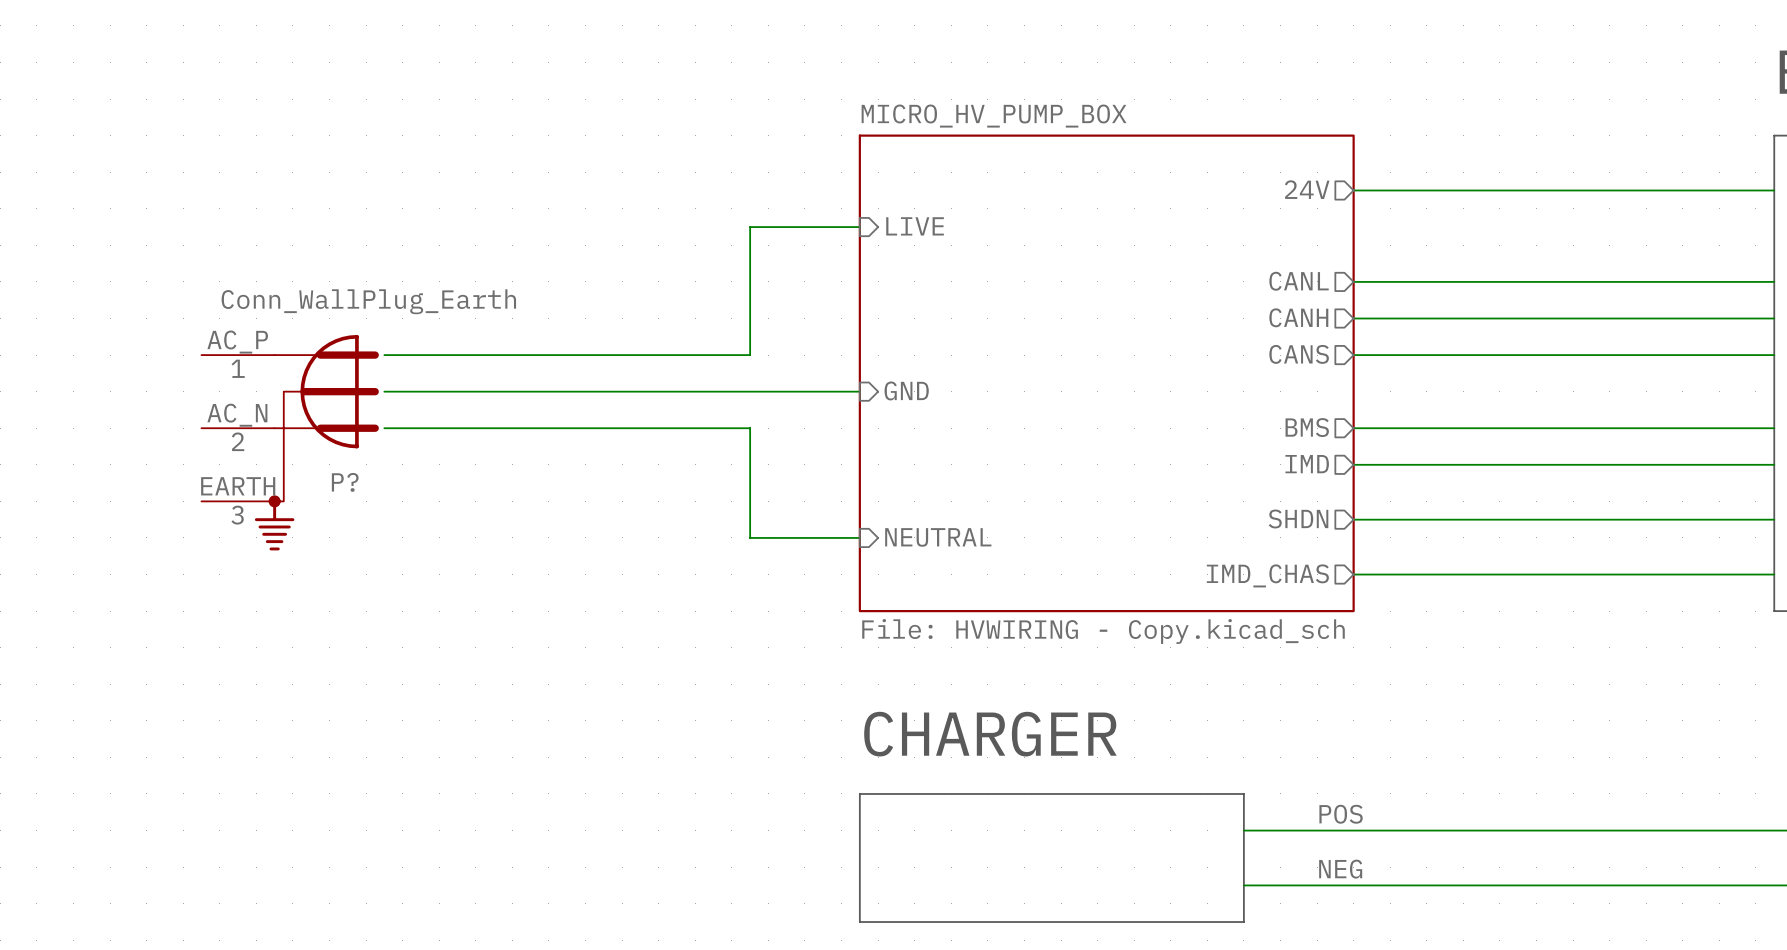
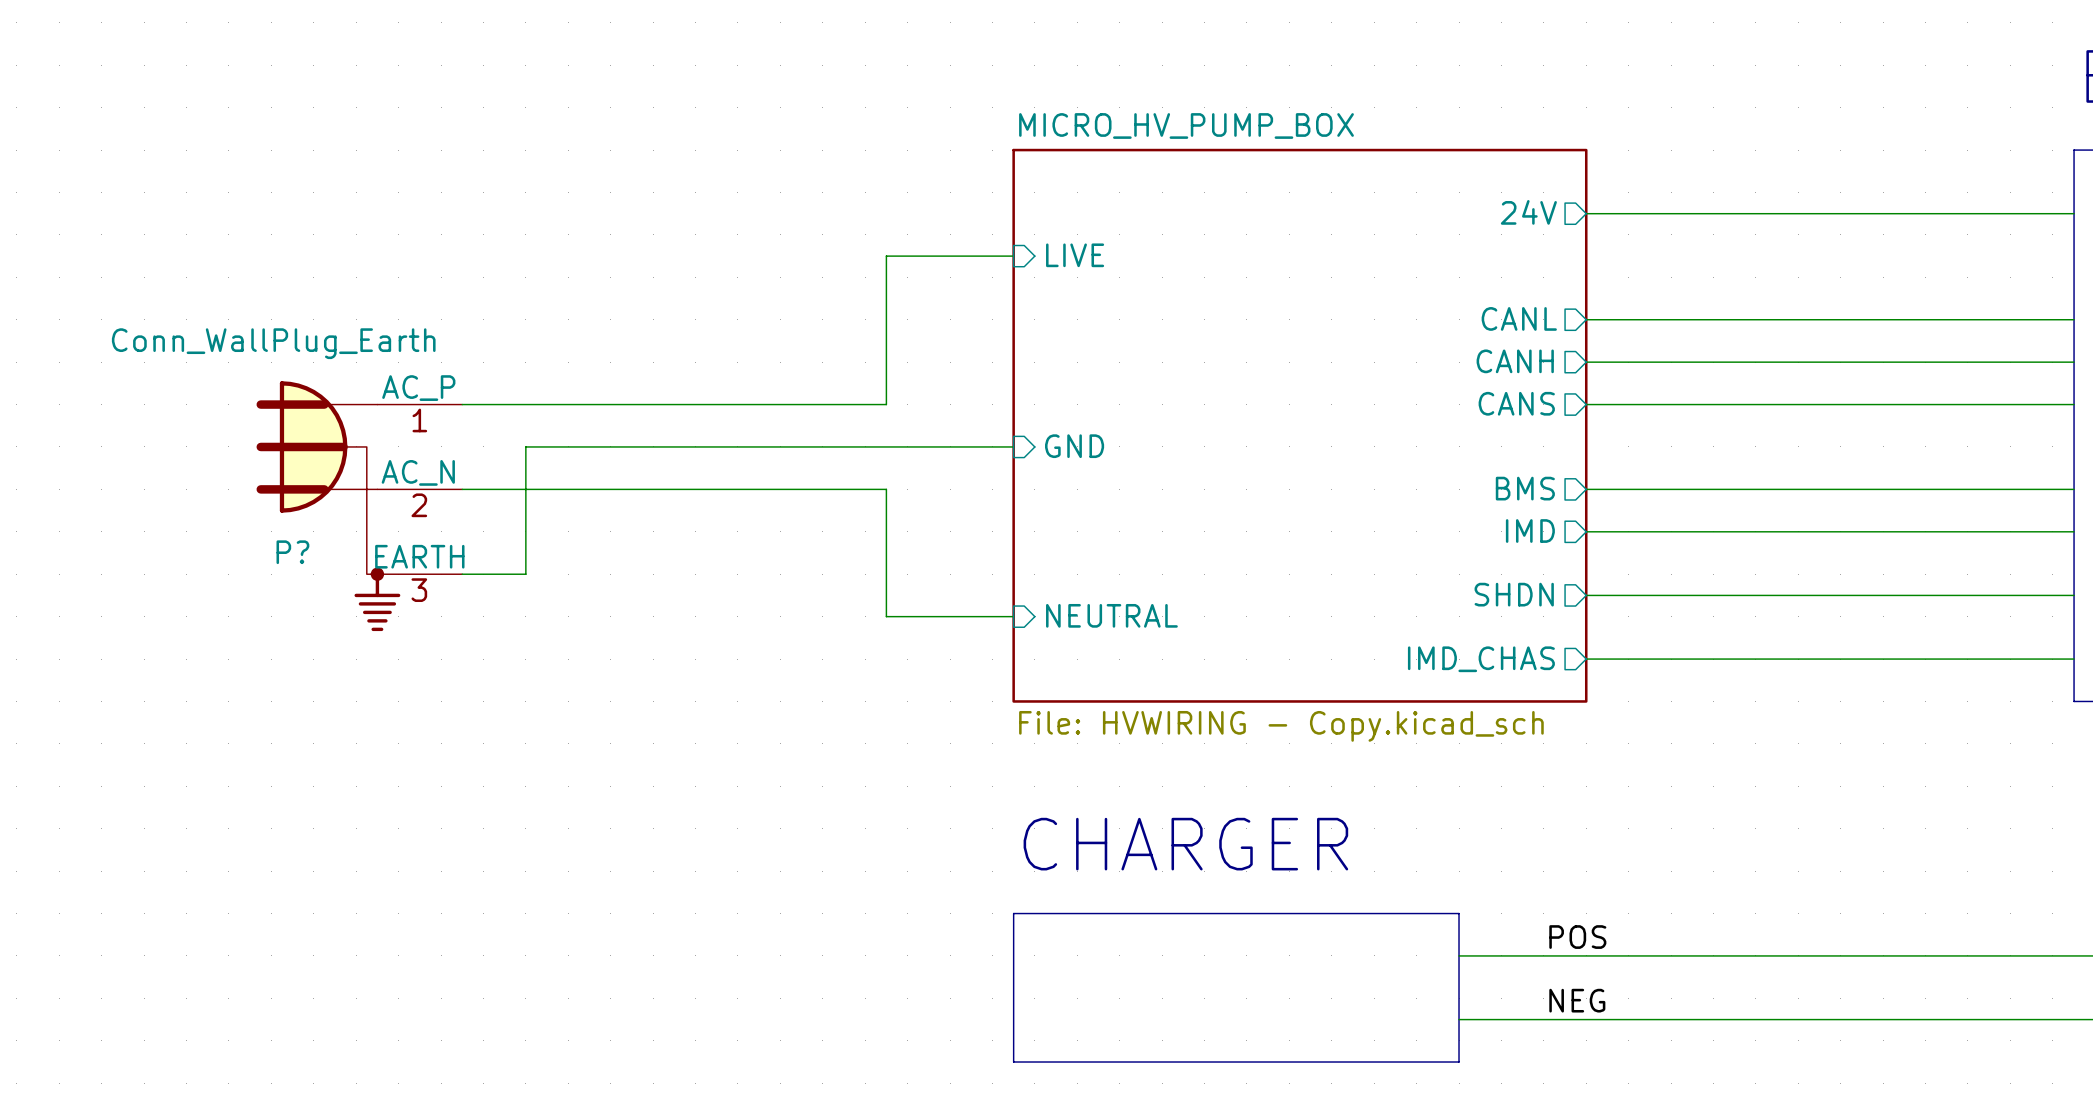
wire: (384, 391) (439, 391) -> (462, 574) (525, 574) (525, 446)
P? flip: as is (316, 442) -> left-right (328, 506)

